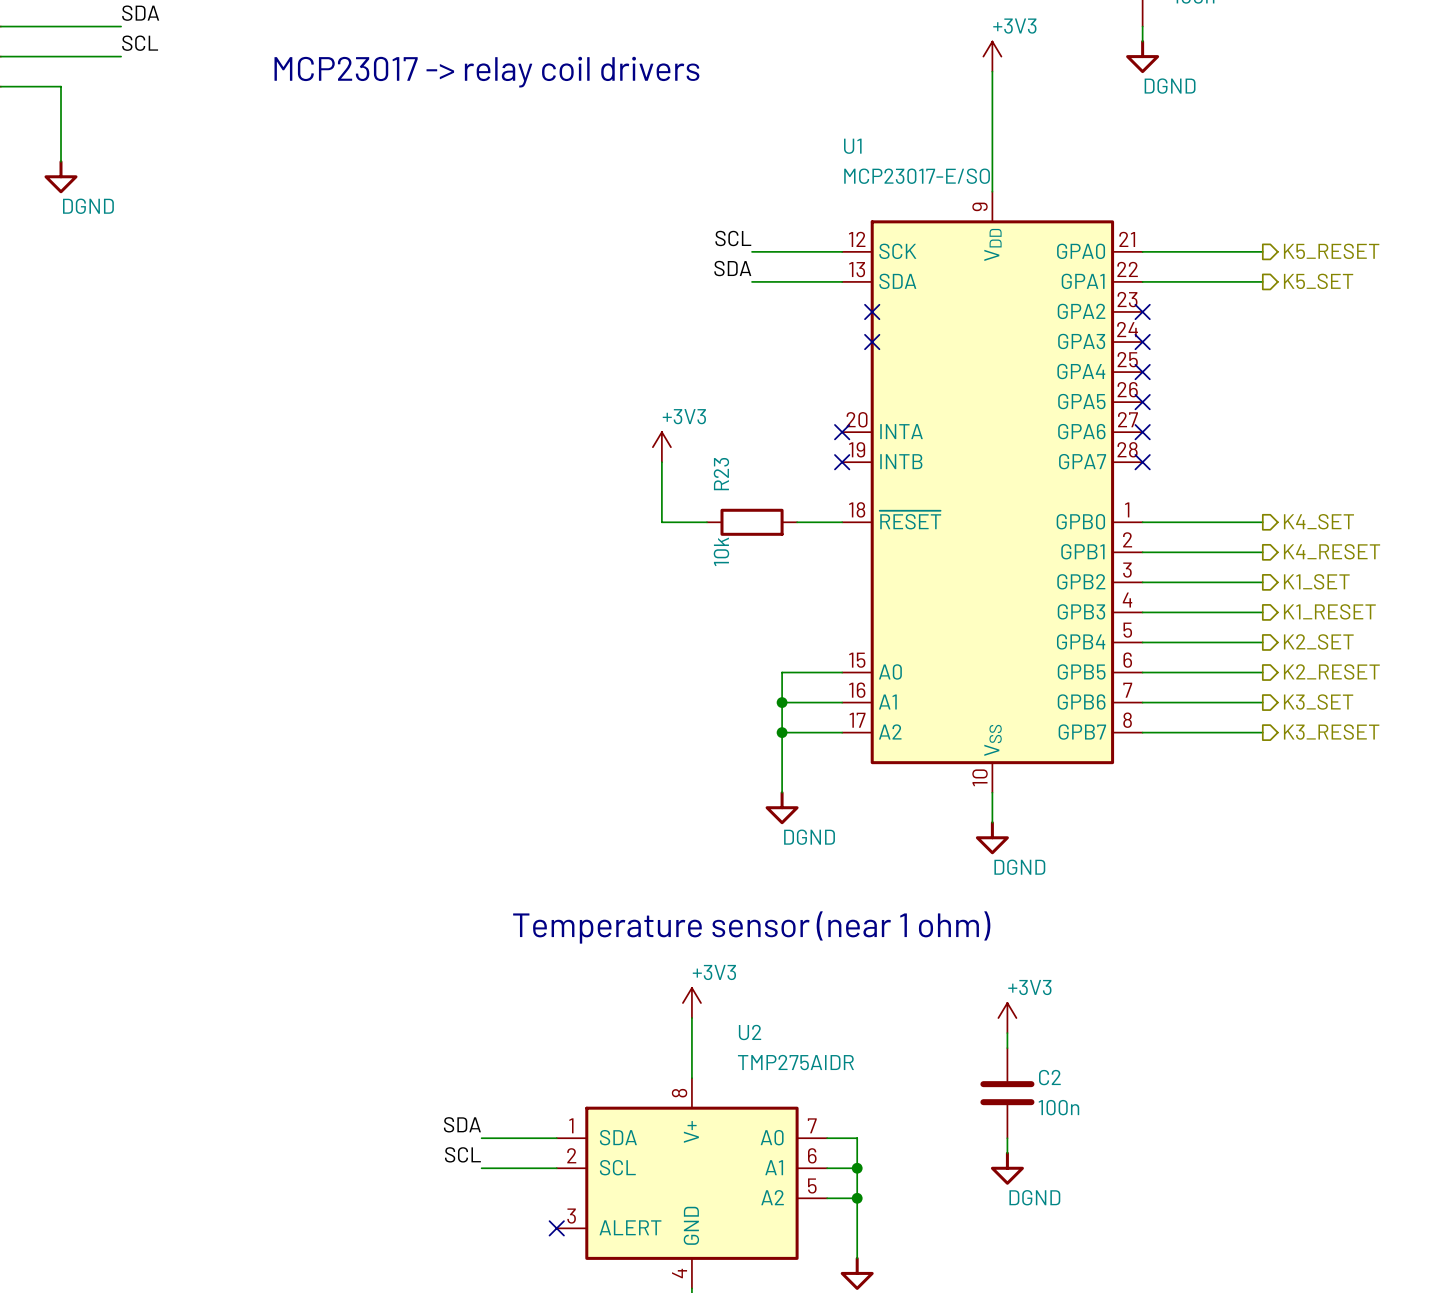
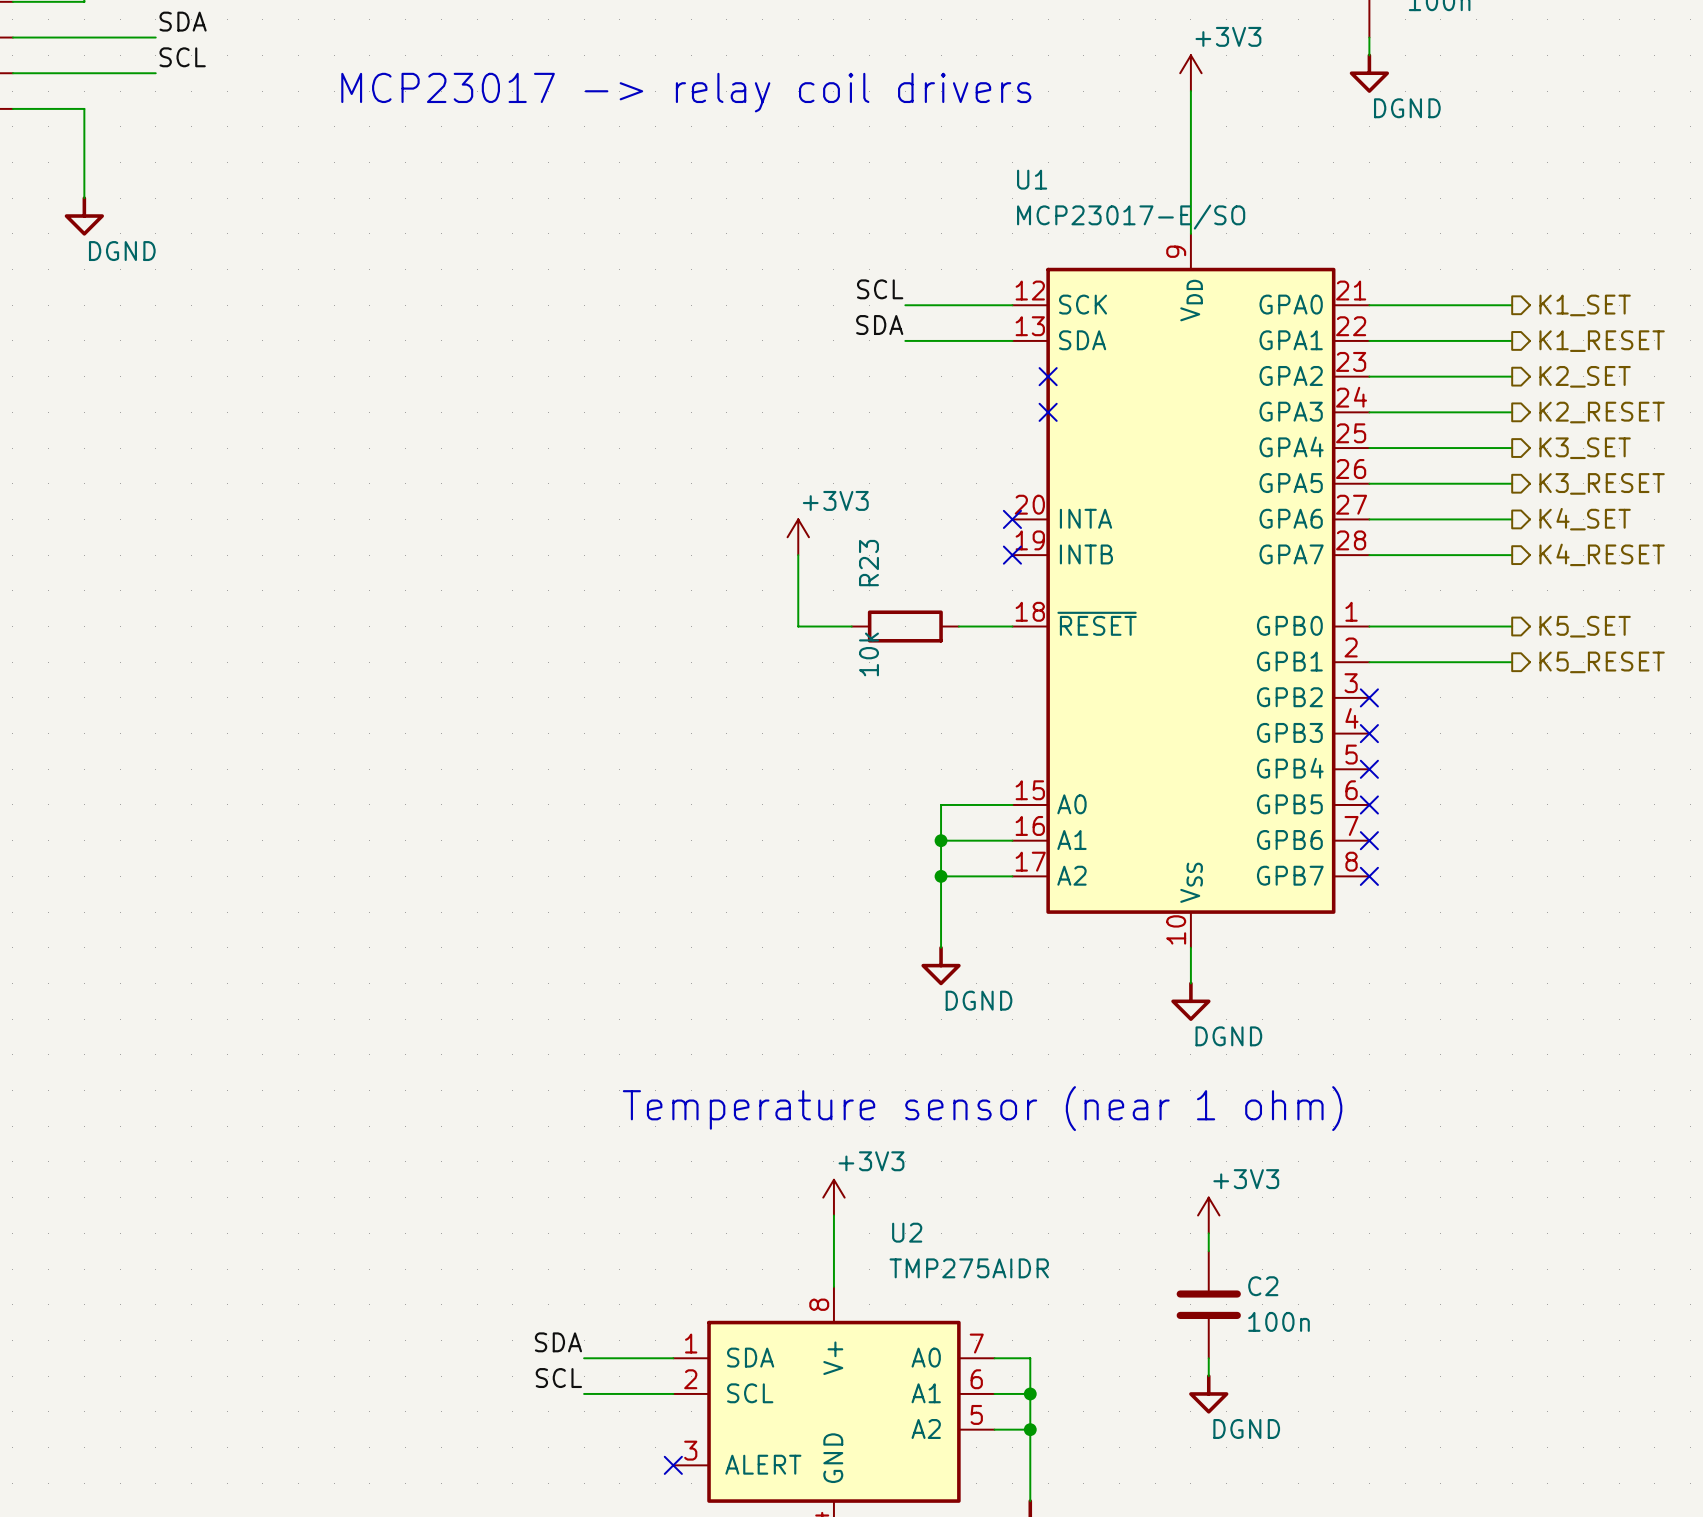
hierarchical label: K5_RESET (1331, 251) -> K1_SET (1585, 305)
hierarchical label: K5_SET (1318, 281) -> K1_RESET (1602, 341)
no-connect mark: (1142, 311) -> none
hierarchical label: none -> K2_SET (1585, 376)
hierarchical label: none -> K2_RESET (1602, 412)
no-connect mark: (1142, 342) -> none
hierarchical label: none -> K3_SET (1585, 448)
no-connect mark: (1142, 372) -> none
hierarchical label: none -> K3_RESET (1602, 483)
no-connect mark: (1142, 402) -> none
hierarchical label: none -> K4_SET (1585, 519)
no-connect mark: (1142, 432) -> none
hierarchical label: none -> K4_RESET (1602, 554)
no-connect mark: (1142, 462) -> none
hierarchical label: K4_SET (1318, 521) -> K5_SET (1585, 626)
hierarchical label: K4_RESET (1332, 551) -> K5_RESET (1602, 662)
hierarchical label: K1_SET (1316, 581) -> none
wire: (1142, 582) (1262, 582) -> (1369, 376) (1512, 376)
no-connect mark: none -> (1369, 697)
hierarchical label: K1_RESET (1329, 611) -> none
wire: (1142, 612) (1262, 612) -> (1369, 412) (1512, 412)
no-connect mark: none -> (1369, 733)
hierarchical label: K2_SET (1318, 641) -> none
wire: (1142, 642) (1262, 642) -> (1369, 448) (1512, 448)
no-connect mark: none -> (1369, 769)
hierarchical label: K2_RESET (1331, 671) -> none
wire: (1142, 672) (1262, 672) -> (1369, 483) (1512, 483)
no-connect mark: none -> (1369, 804)
wire: (1142, 702) (1262, 702) -> (1369, 519) (1512, 519)
no-connect mark: none -> (1369, 840)
hierarchical label: K3_SET (1318, 702) -> none
wire: (1142, 732) (1262, 732) -> (1369, 555) (1512, 555)
no-connect mark: none -> (1369, 876)
hierarchical label: K3_RESET (1331, 732) -> none

